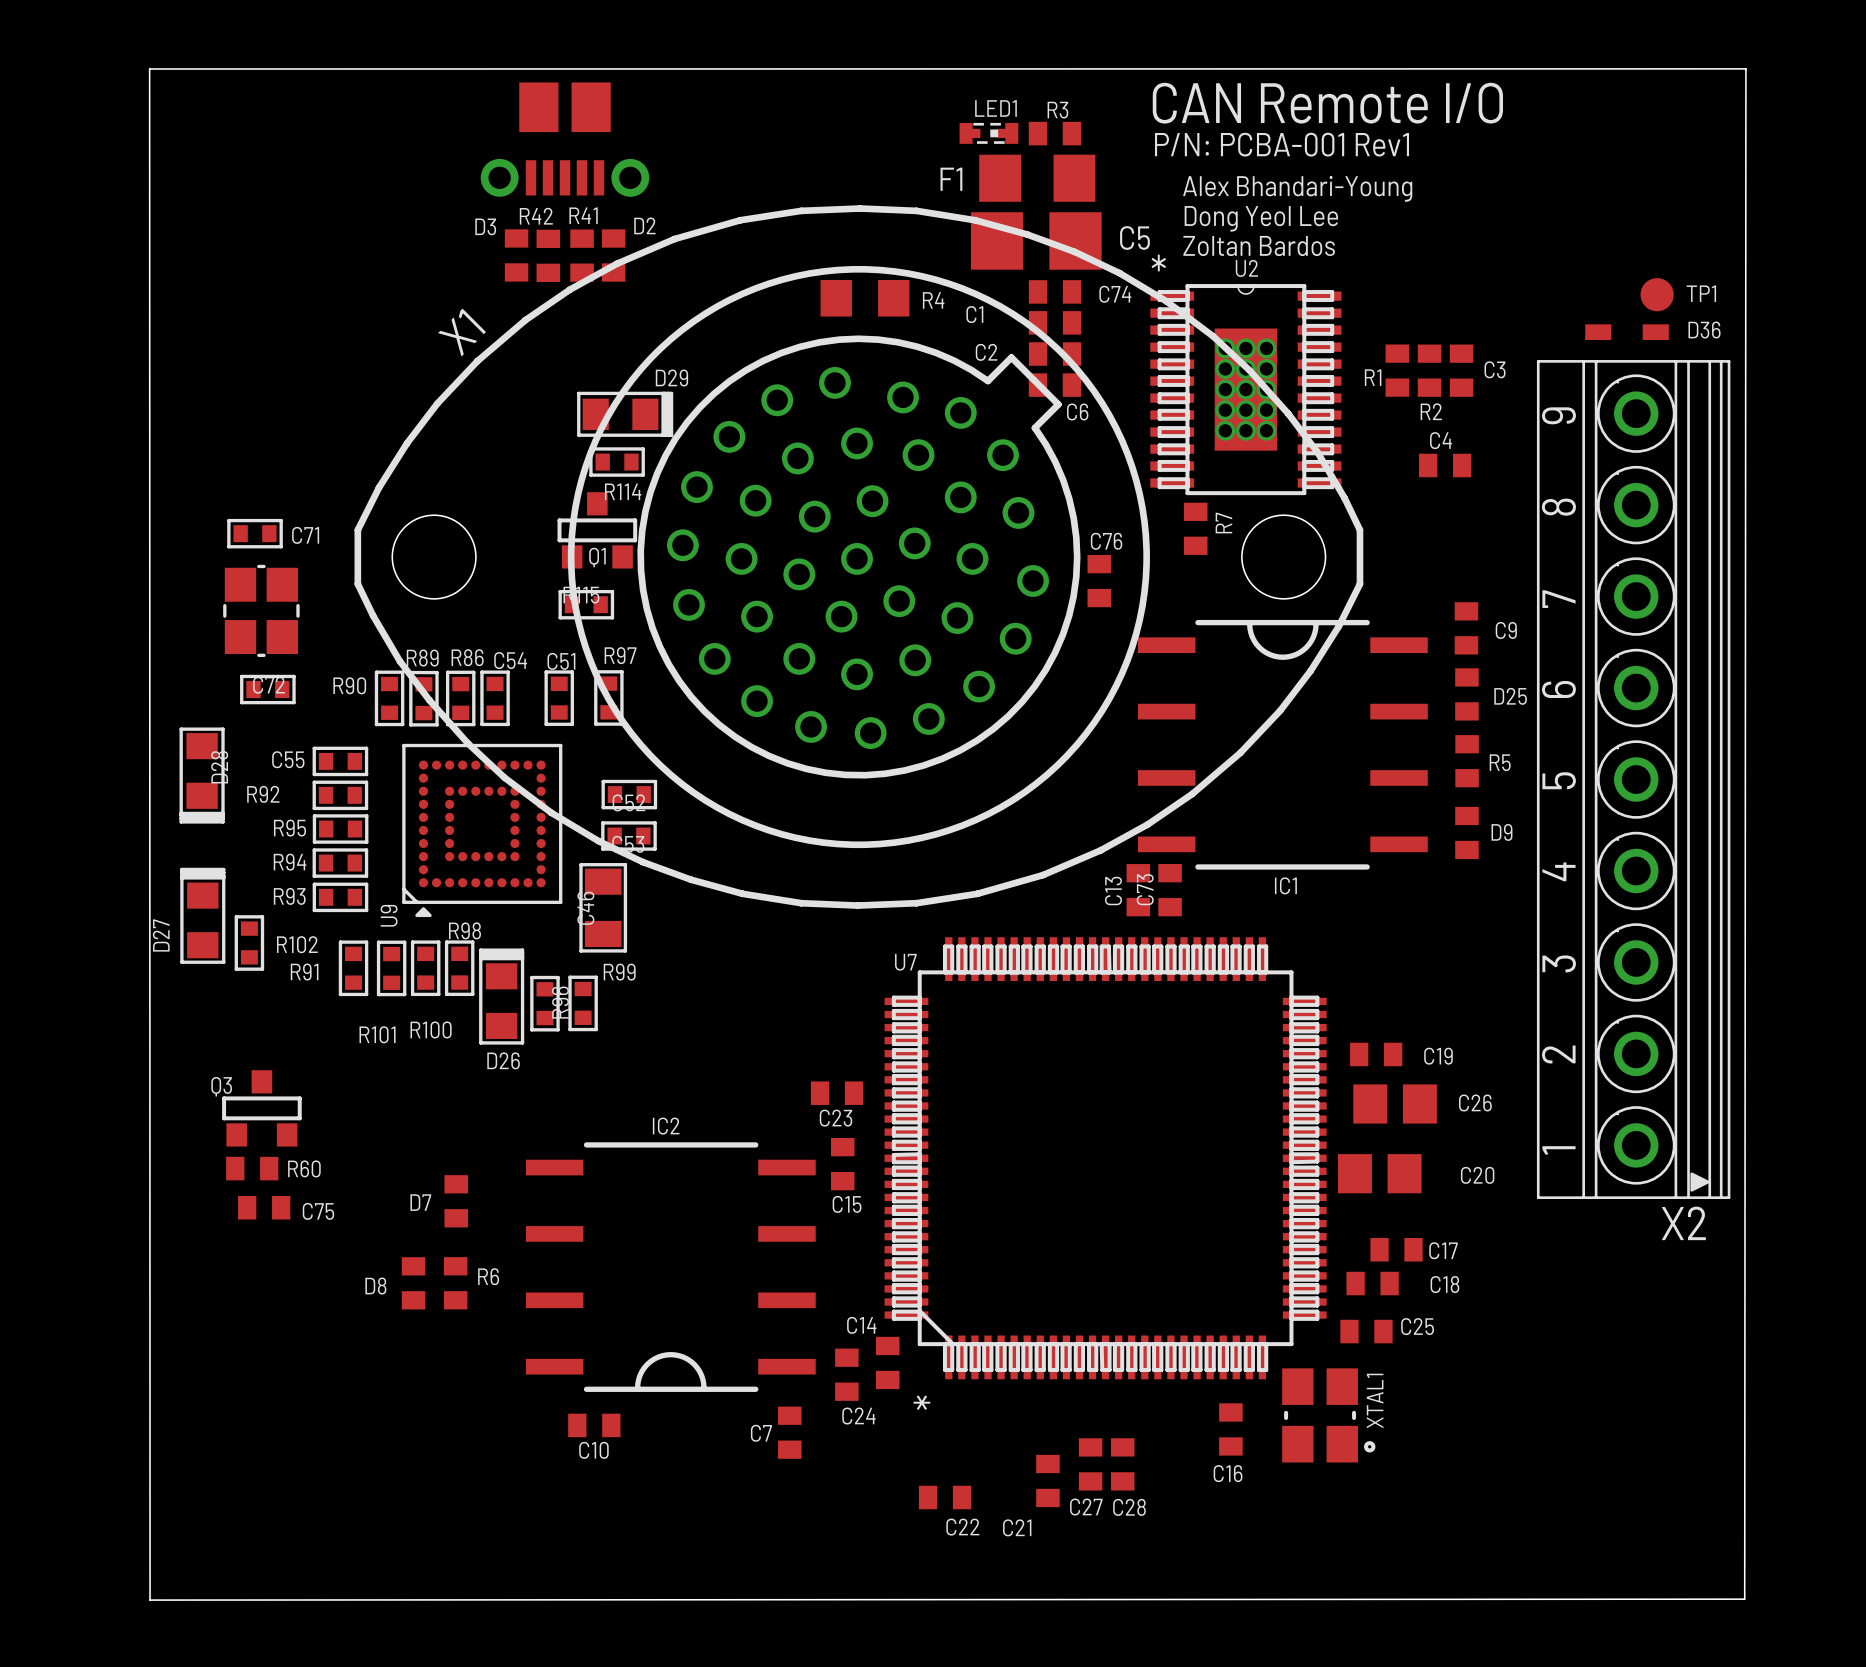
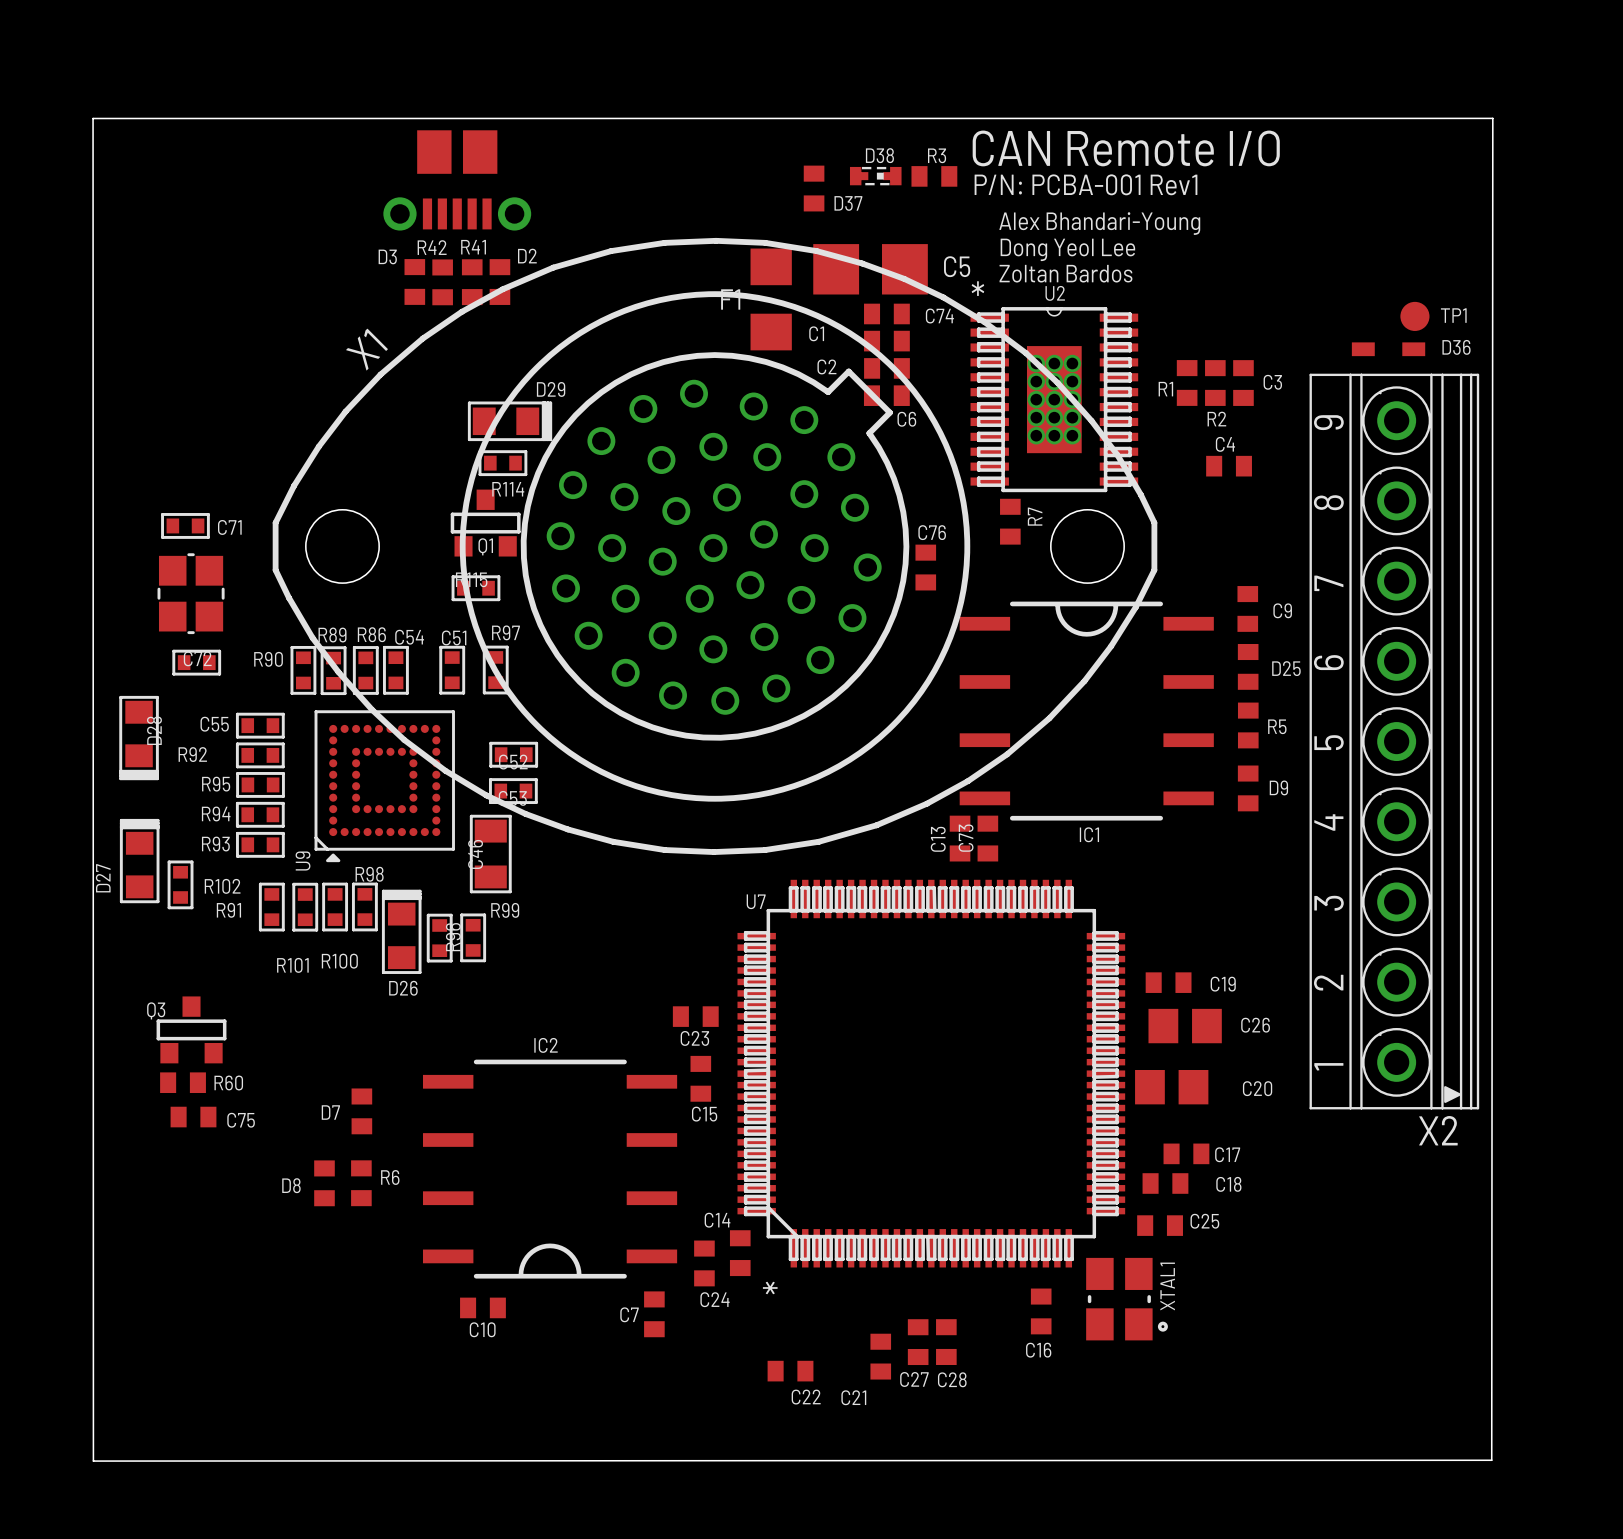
LED1: (988, 133) -> none
R3 position: (1054, 133) -> (934, 176)
D38: none -> (875, 176)
D37: none -> (814, 188)
F1 rotation: 0° (1037, 178) -> 90° clockwise (771, 299)
F1 position: (1037, 178) -> (771, 299)
R4: (864, 298) -> none

